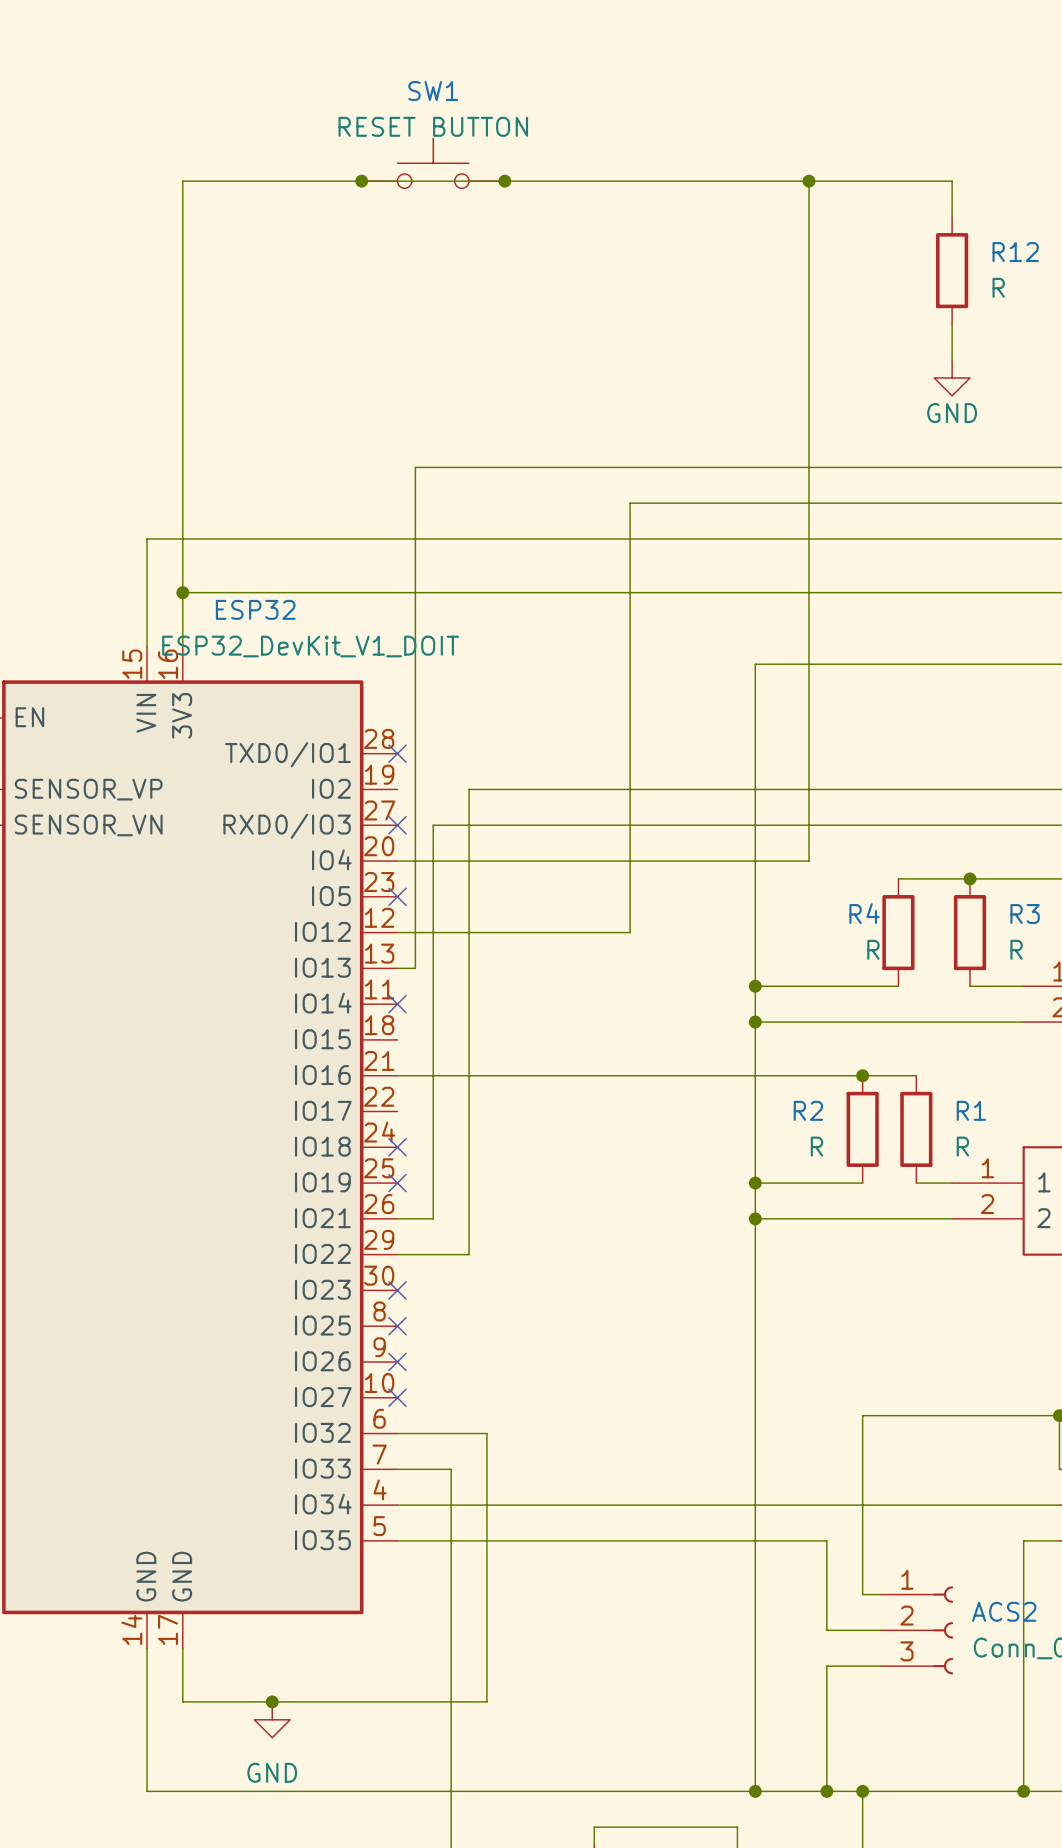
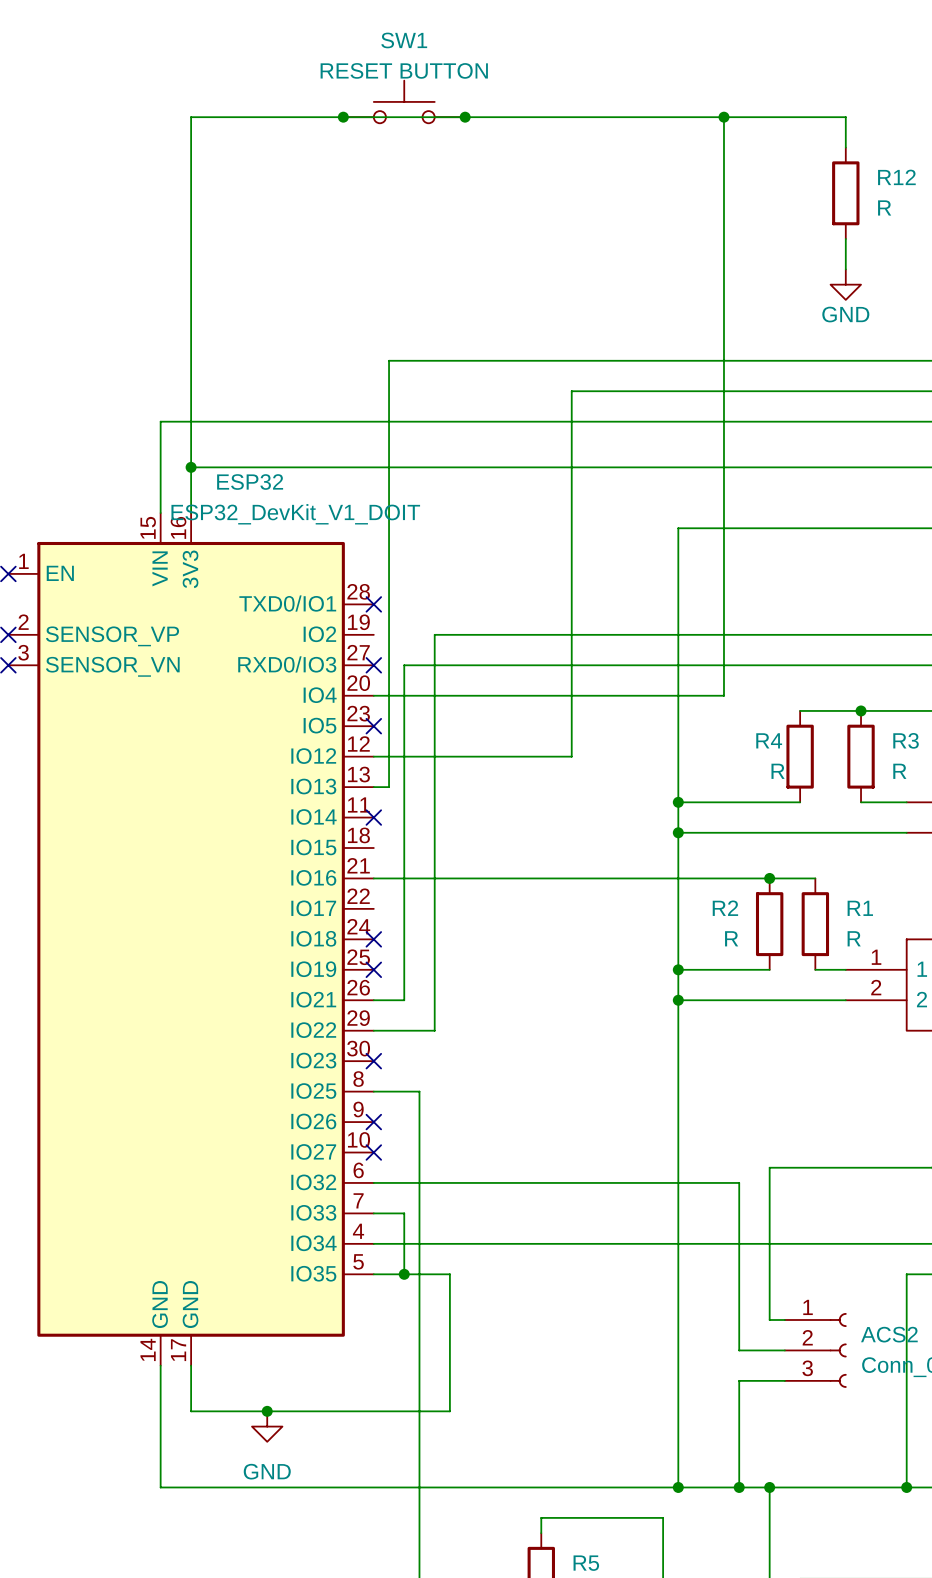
wire: none -> (373, 1091) (419, 1091) (419, 1213)
no-connect mark: (397, 1326) -> none
wire: (486, 1433) (486, 1540) (826, 1540) -> (449, 1182) (739, 1182) (739, 1274)
wire: (433, 1469) (451, 1469) -> (404, 1213) (404, 1274)
junction: none -> (404, 1274)

